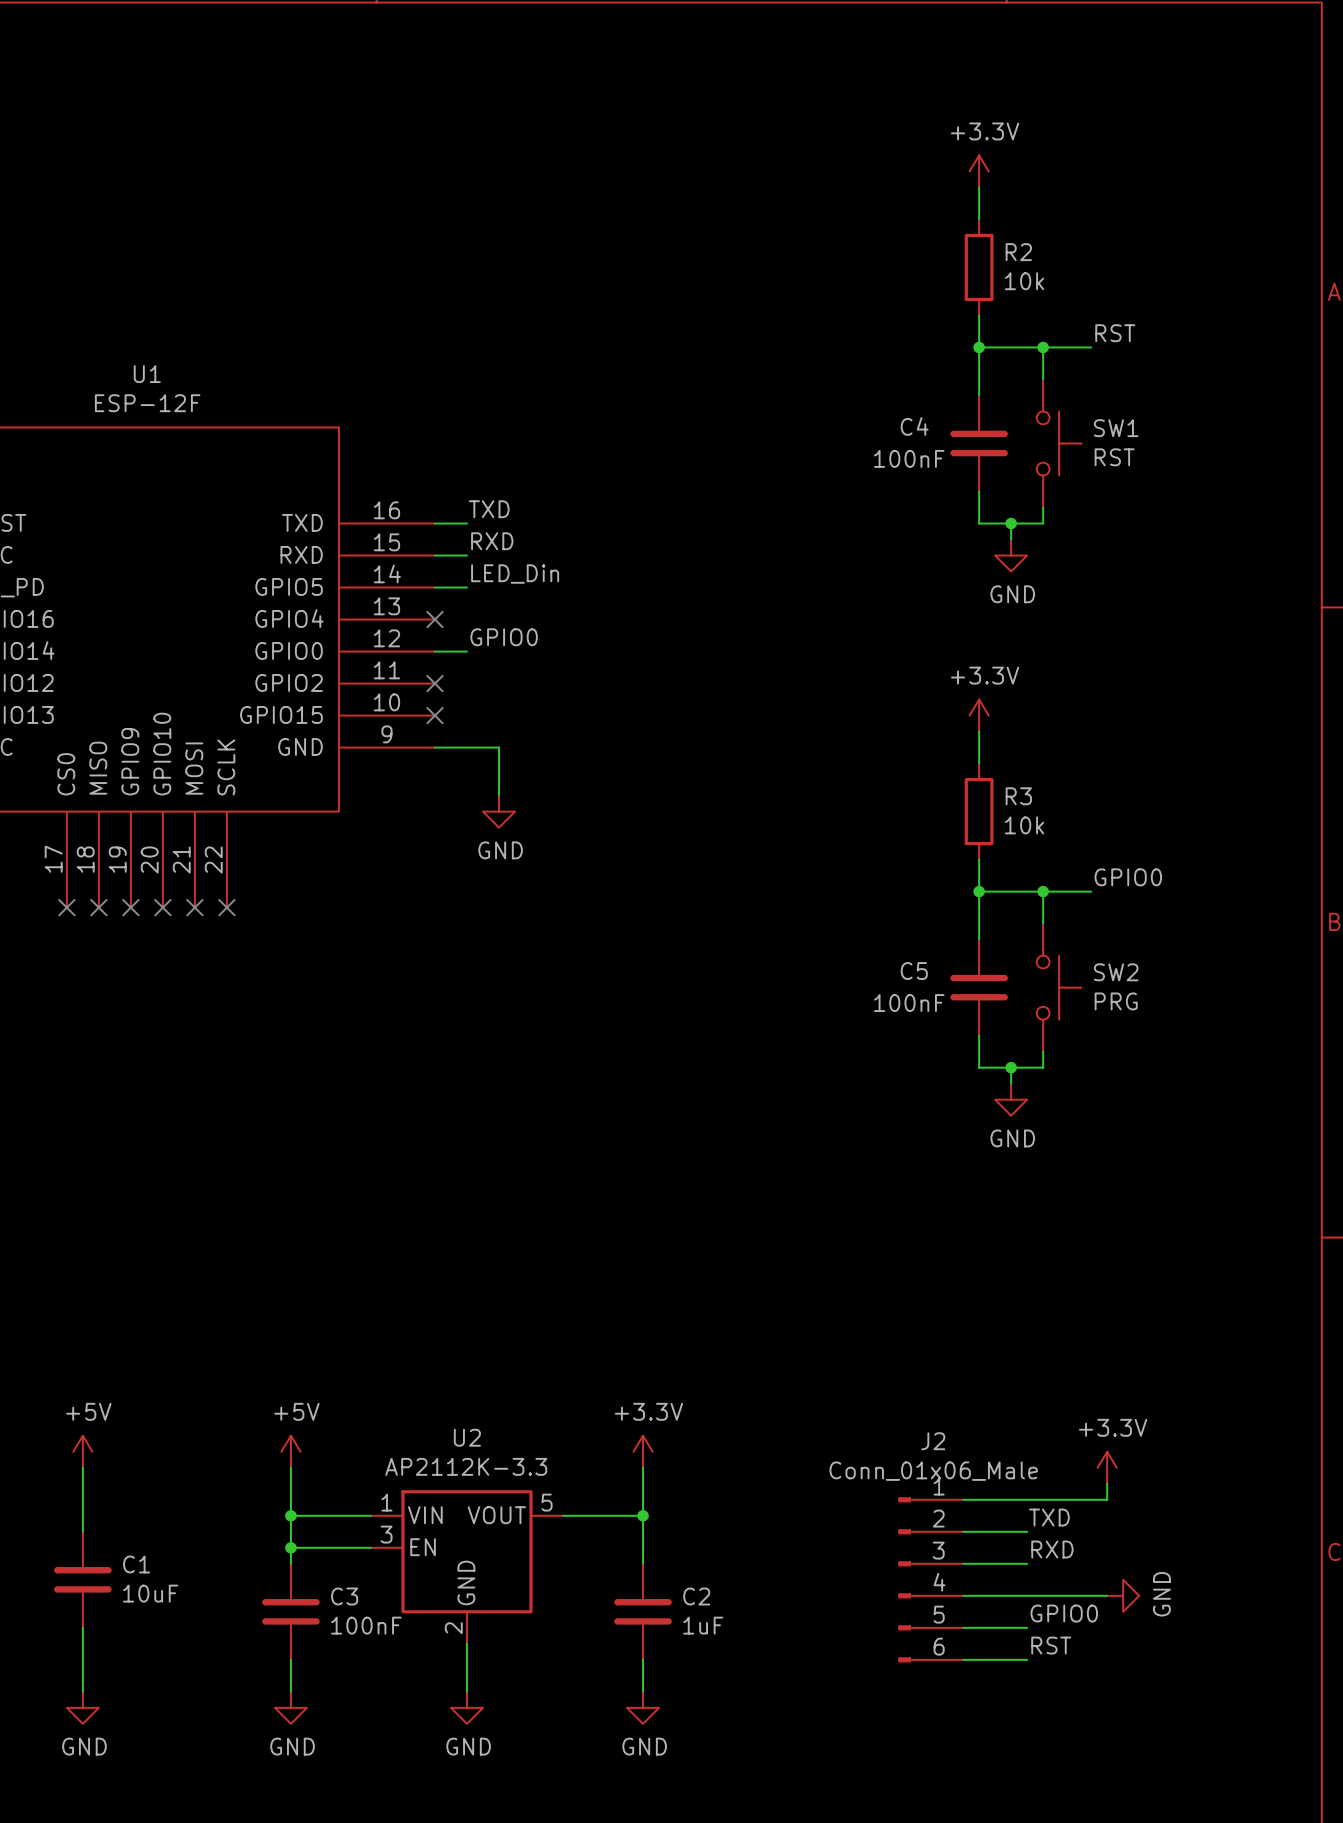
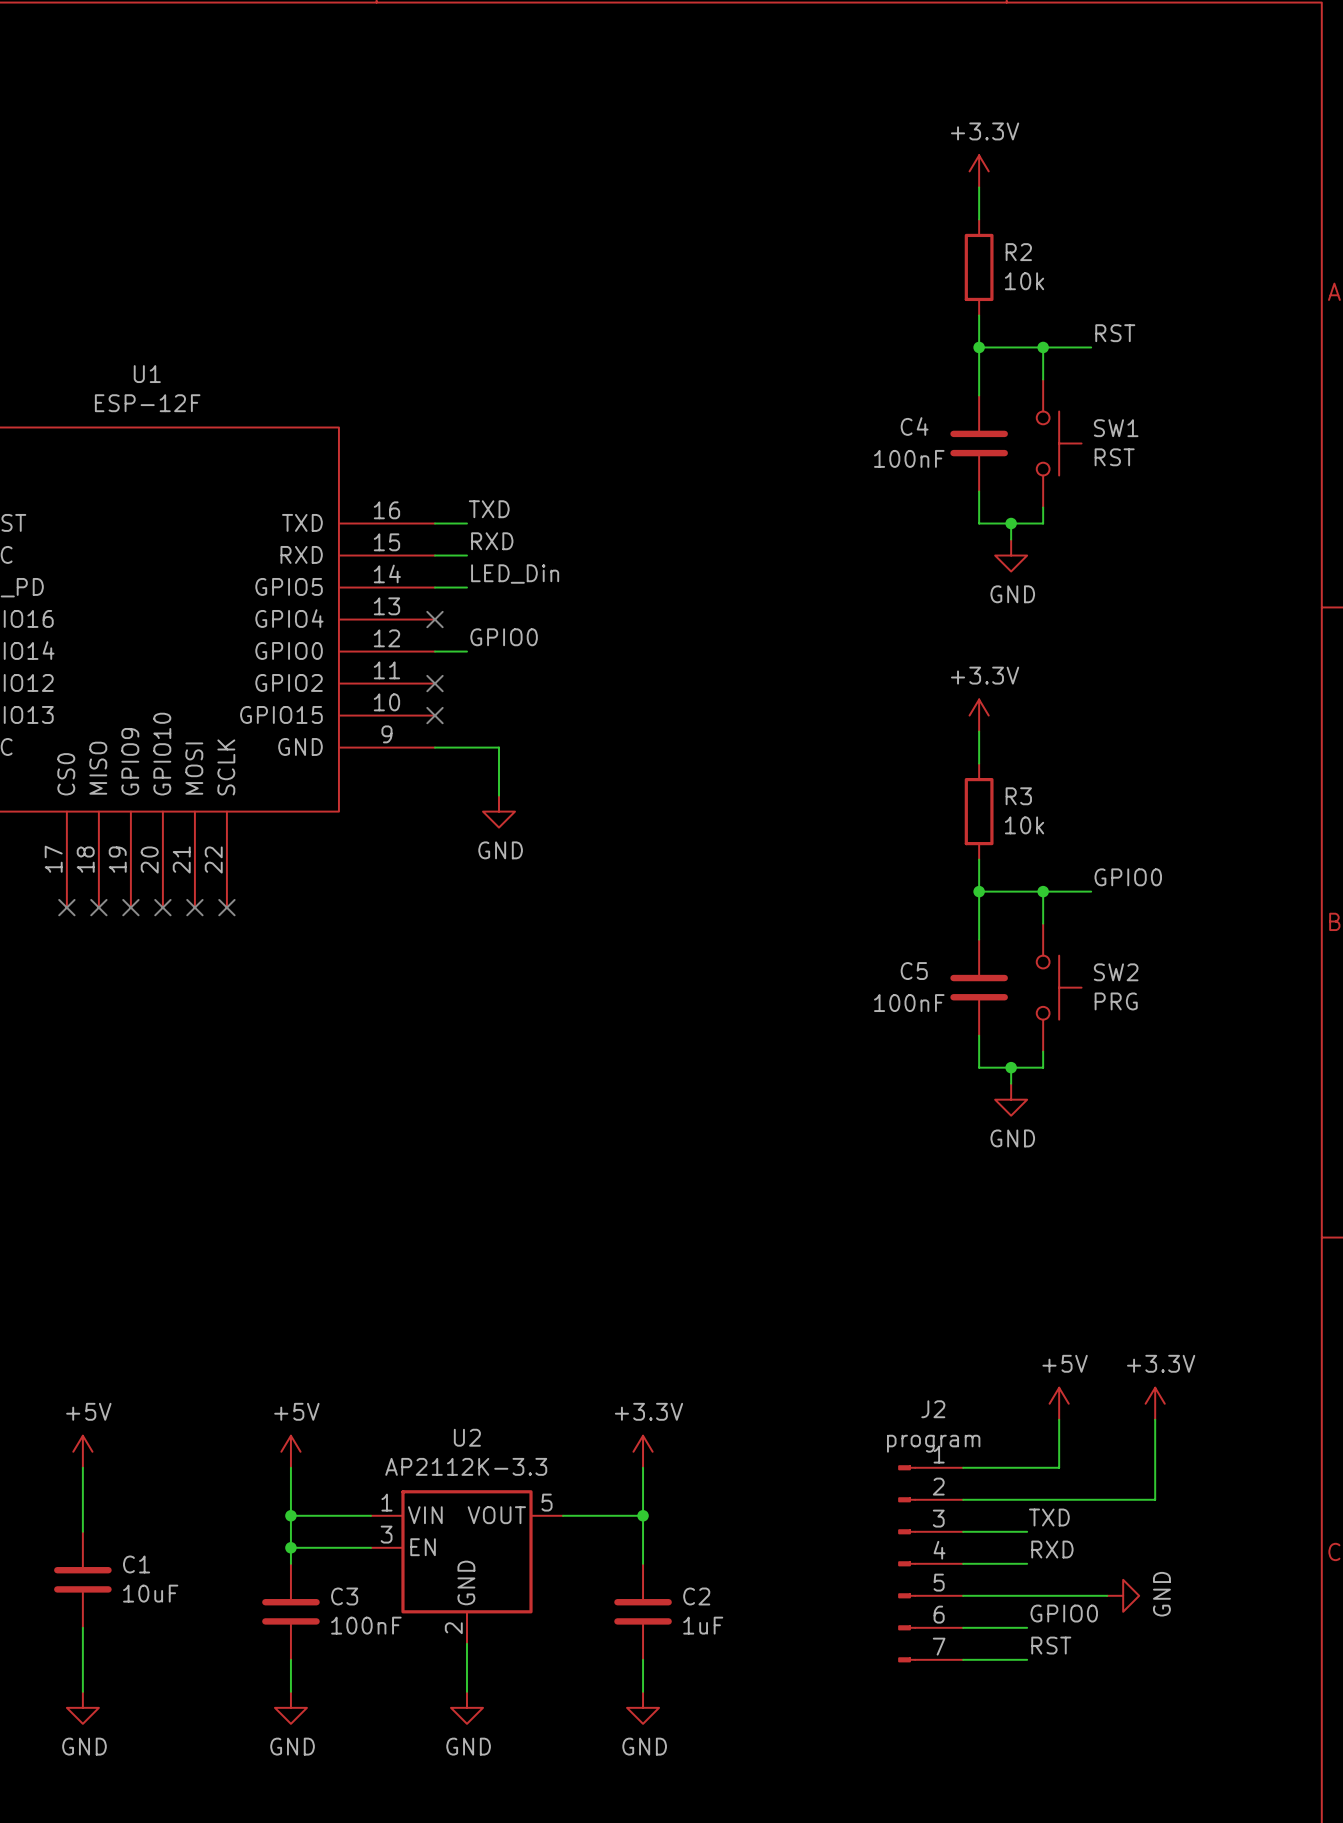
power symbol: none -> +5V (1059, 1403)
wire: none -> (1059, 1419) (1059, 1467) (963, 1467)
power symbol position: +3.3V (1107, 1467) -> +3.3V (1155, 1403)
J2 value: Conn_01x06_Male (933, 1471) -> program (933, 1443)
wire: (1107, 1483) (1107, 1499) -> (1155, 1419) (1155, 1499) (1107, 1499)
J2 symbol: [898, 1497, 964, 1663] -> [898, 1465, 964, 1663]

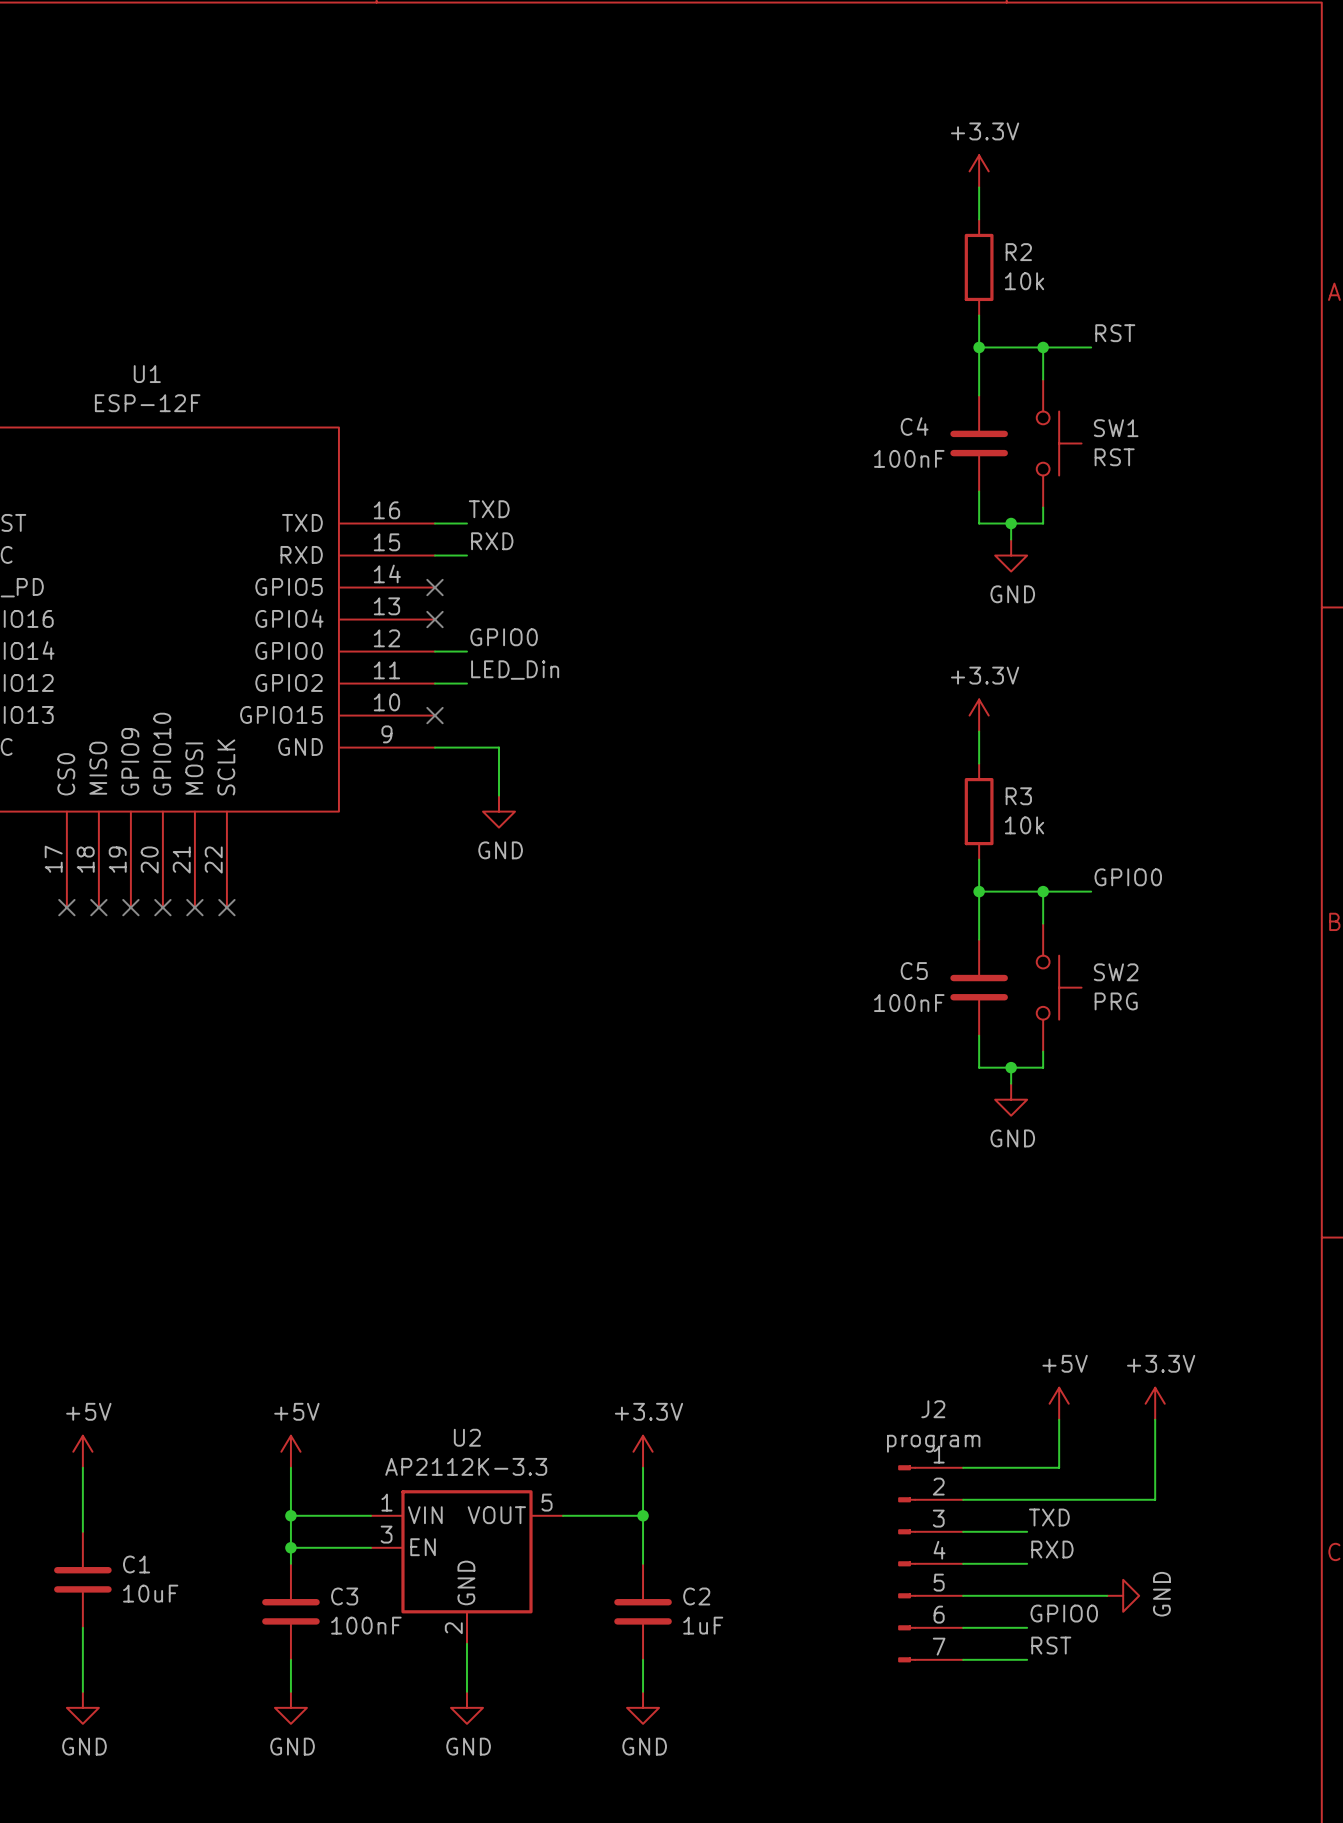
label position: LED_Din (515, 574) -> LED_Din (515, 670)
wire: (434, 587) (466, 587) -> (434, 683) (466, 683)
no-connect mark: none -> (434, 587)
no-connect mark: (434, 683) -> none

